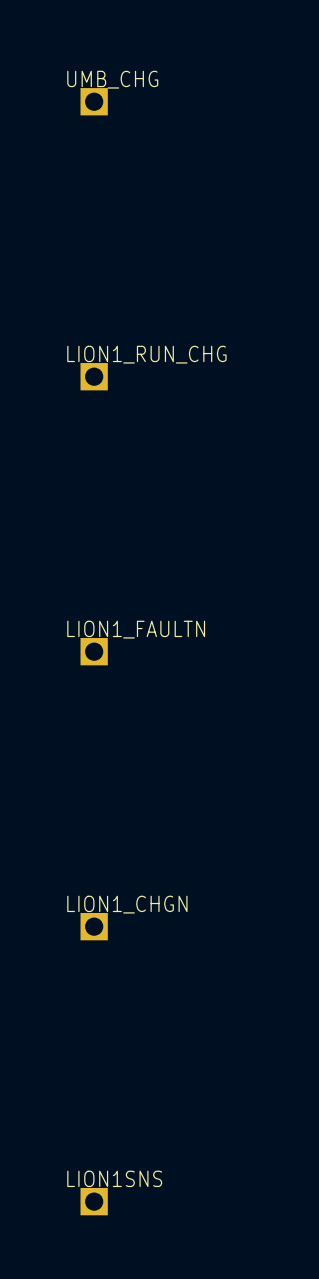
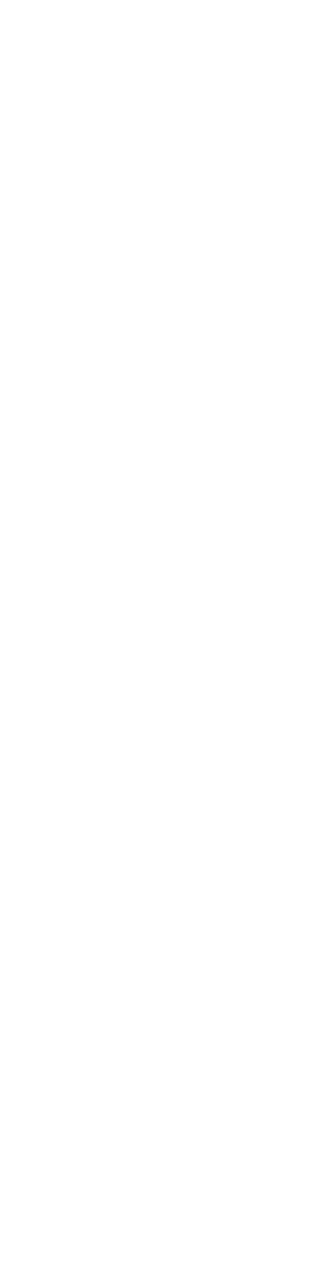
part: UMB_CHG (94, 101) -> none
part: LION1_RUN_CHG (94, 376) -> none
part: LION1_FAULTN (94, 651) -> none
part: LION1_CHGN (94, 926) -> none
part: LION1SNS (94, 1201) -> none

